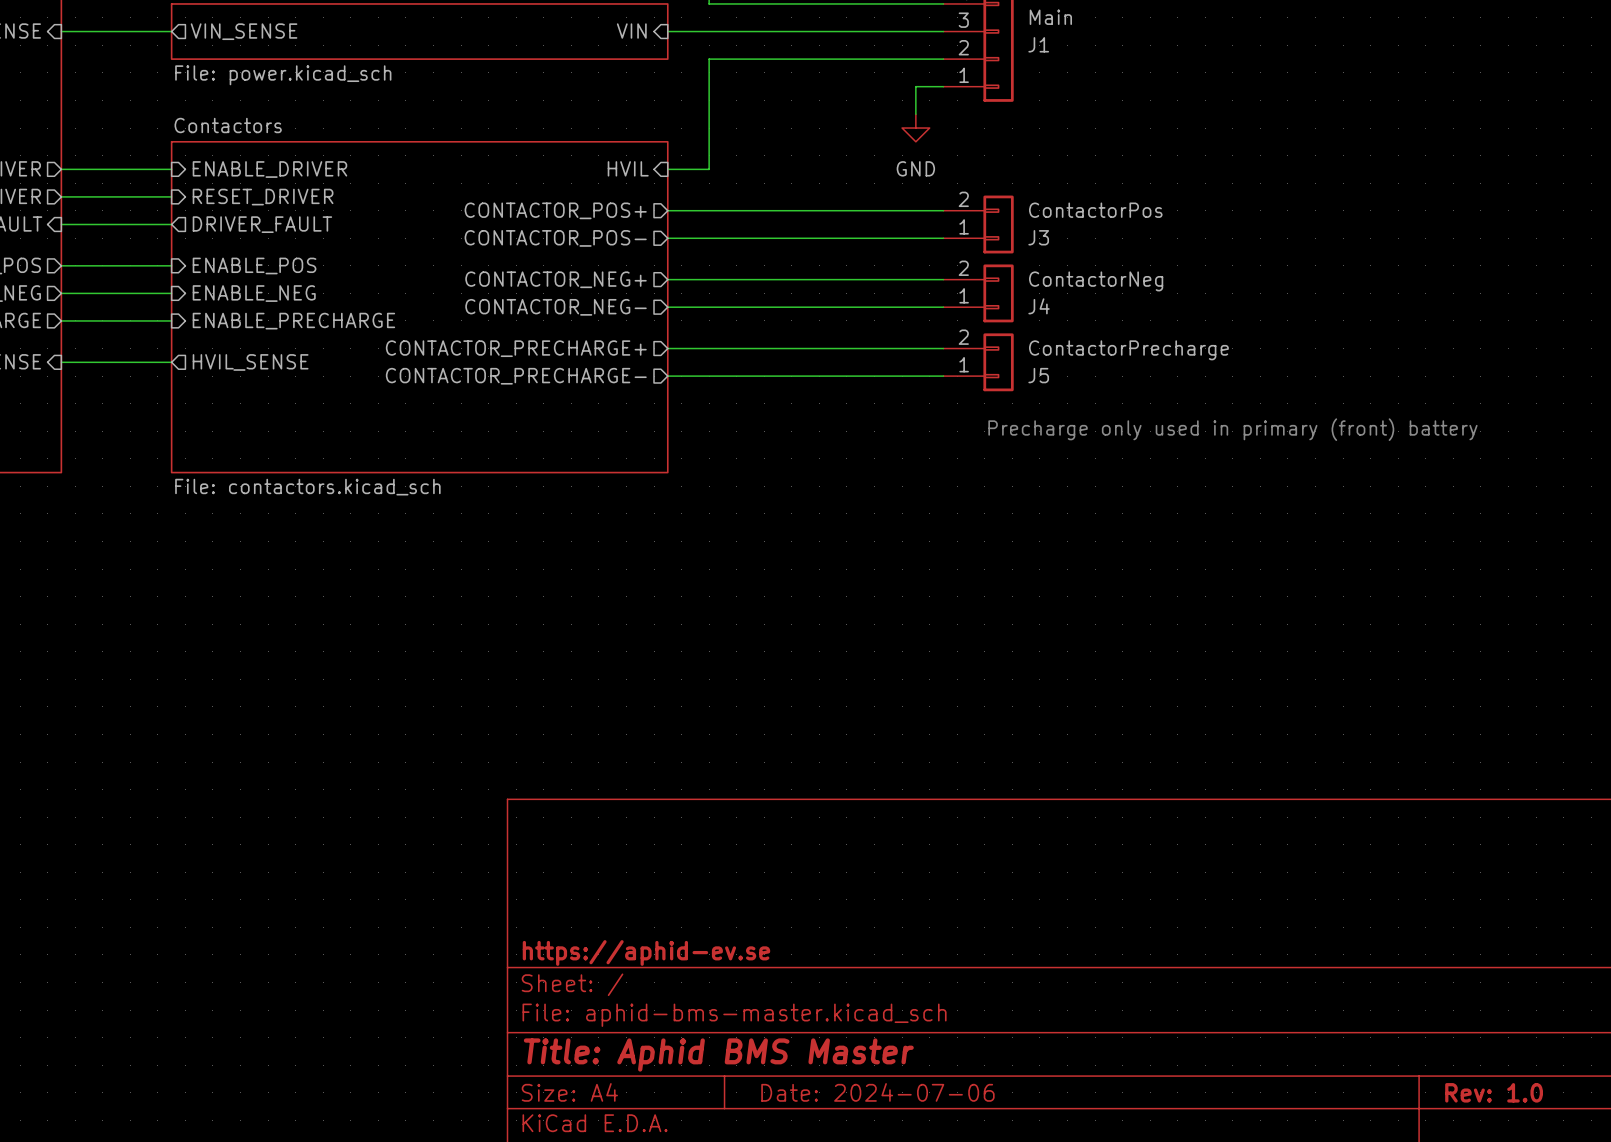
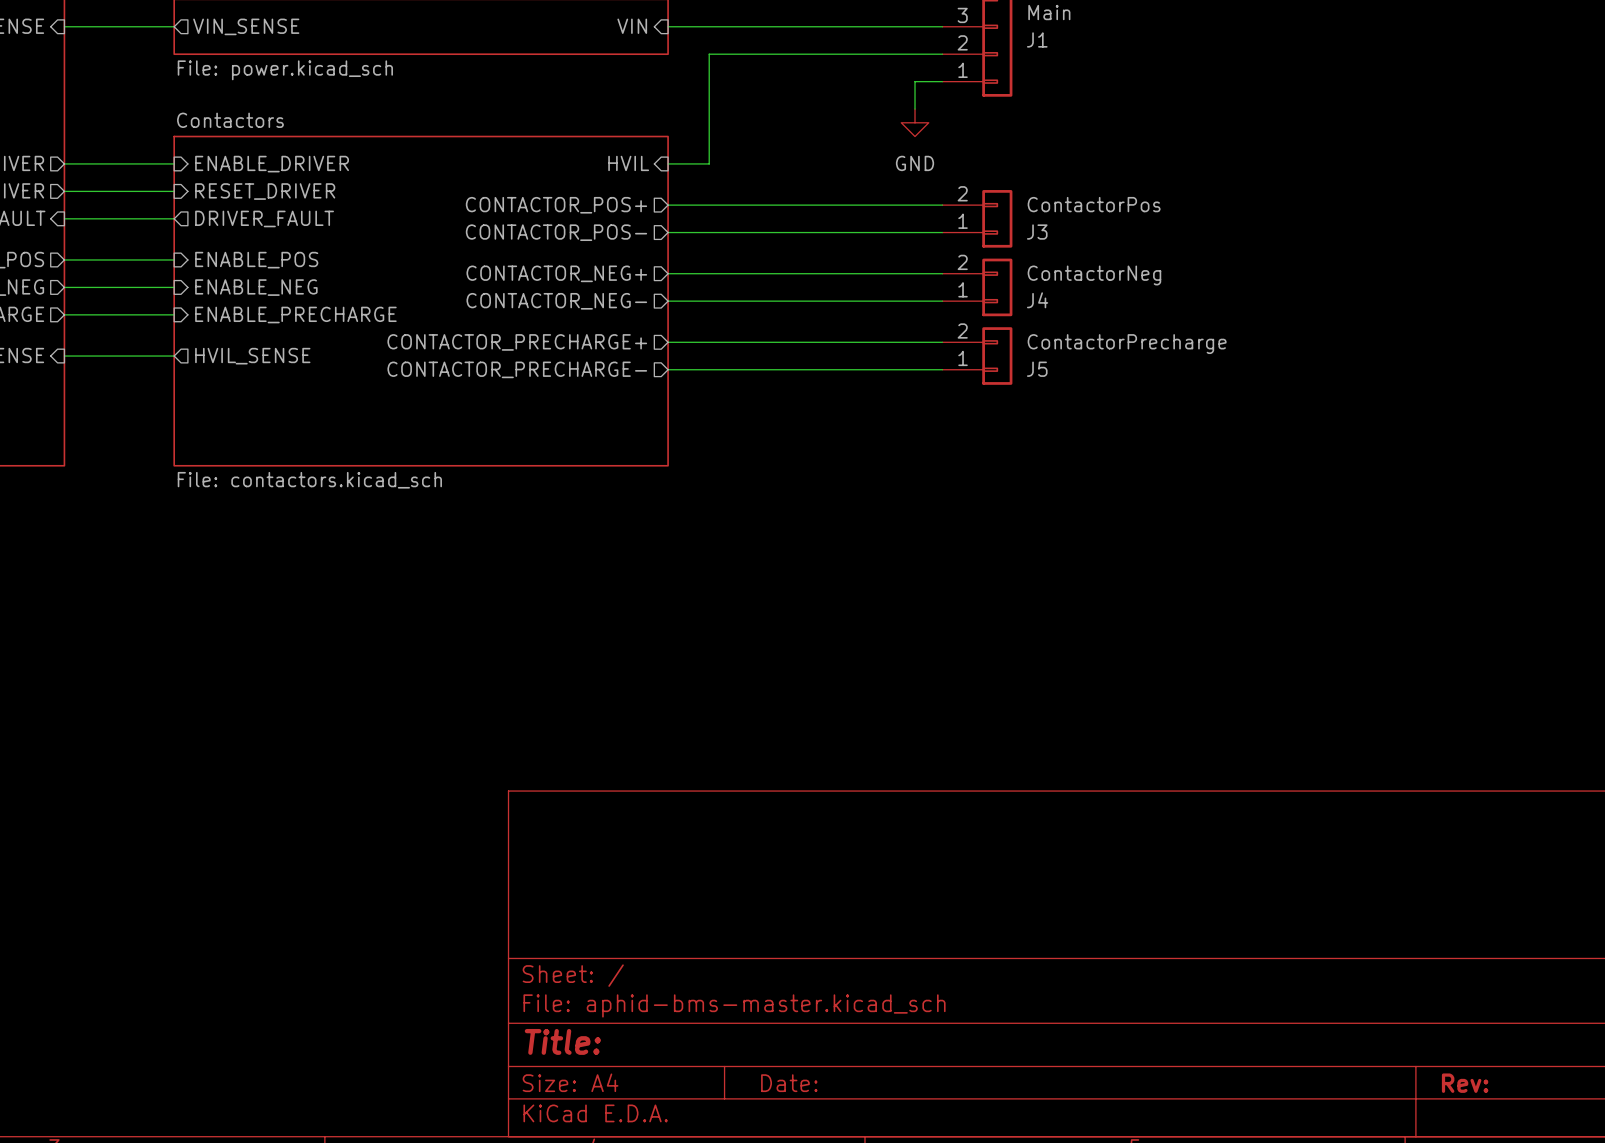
text: Precharge only used in primary (front) battery (1232, 429) -> none
title block: https://aphid-ev.se (646, 952) -> none
title block: Title: Aphid BMS Master (718, 1054) -> Title: (562, 1041)
title block: Date: 2024-07-06 (877, 1092) -> Date: (789, 1083)
title block: Rev: 1.0 (1494, 1092) -> Rev: (1465, 1083)

